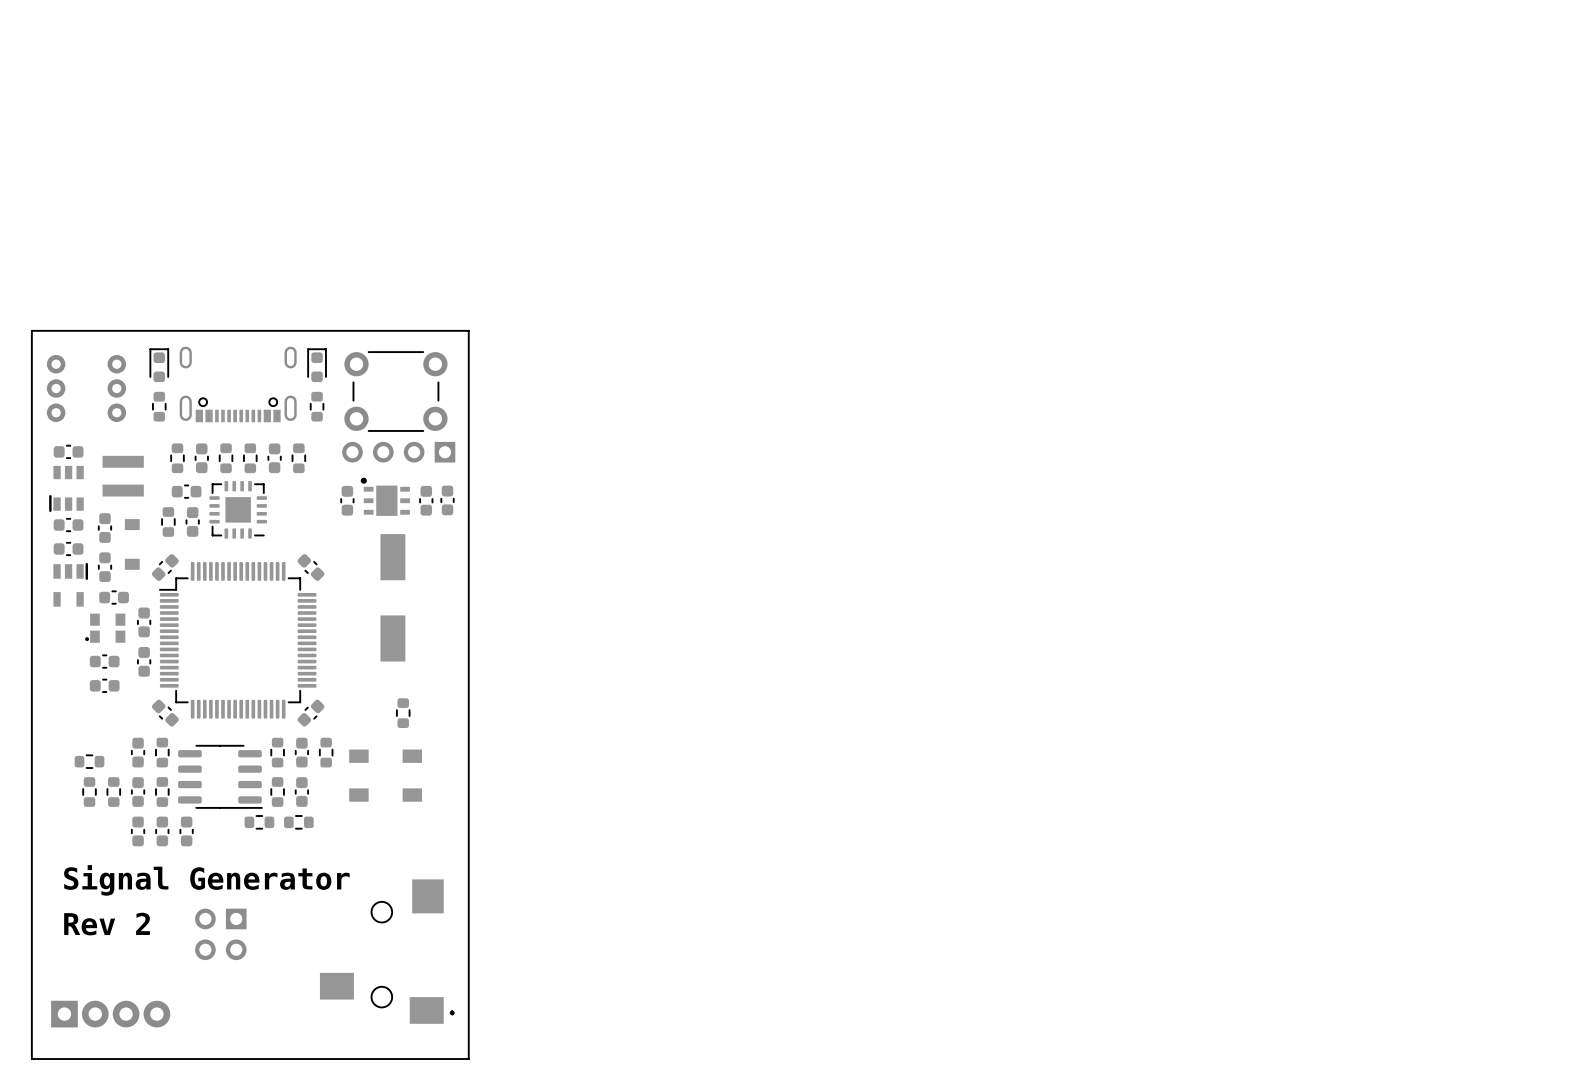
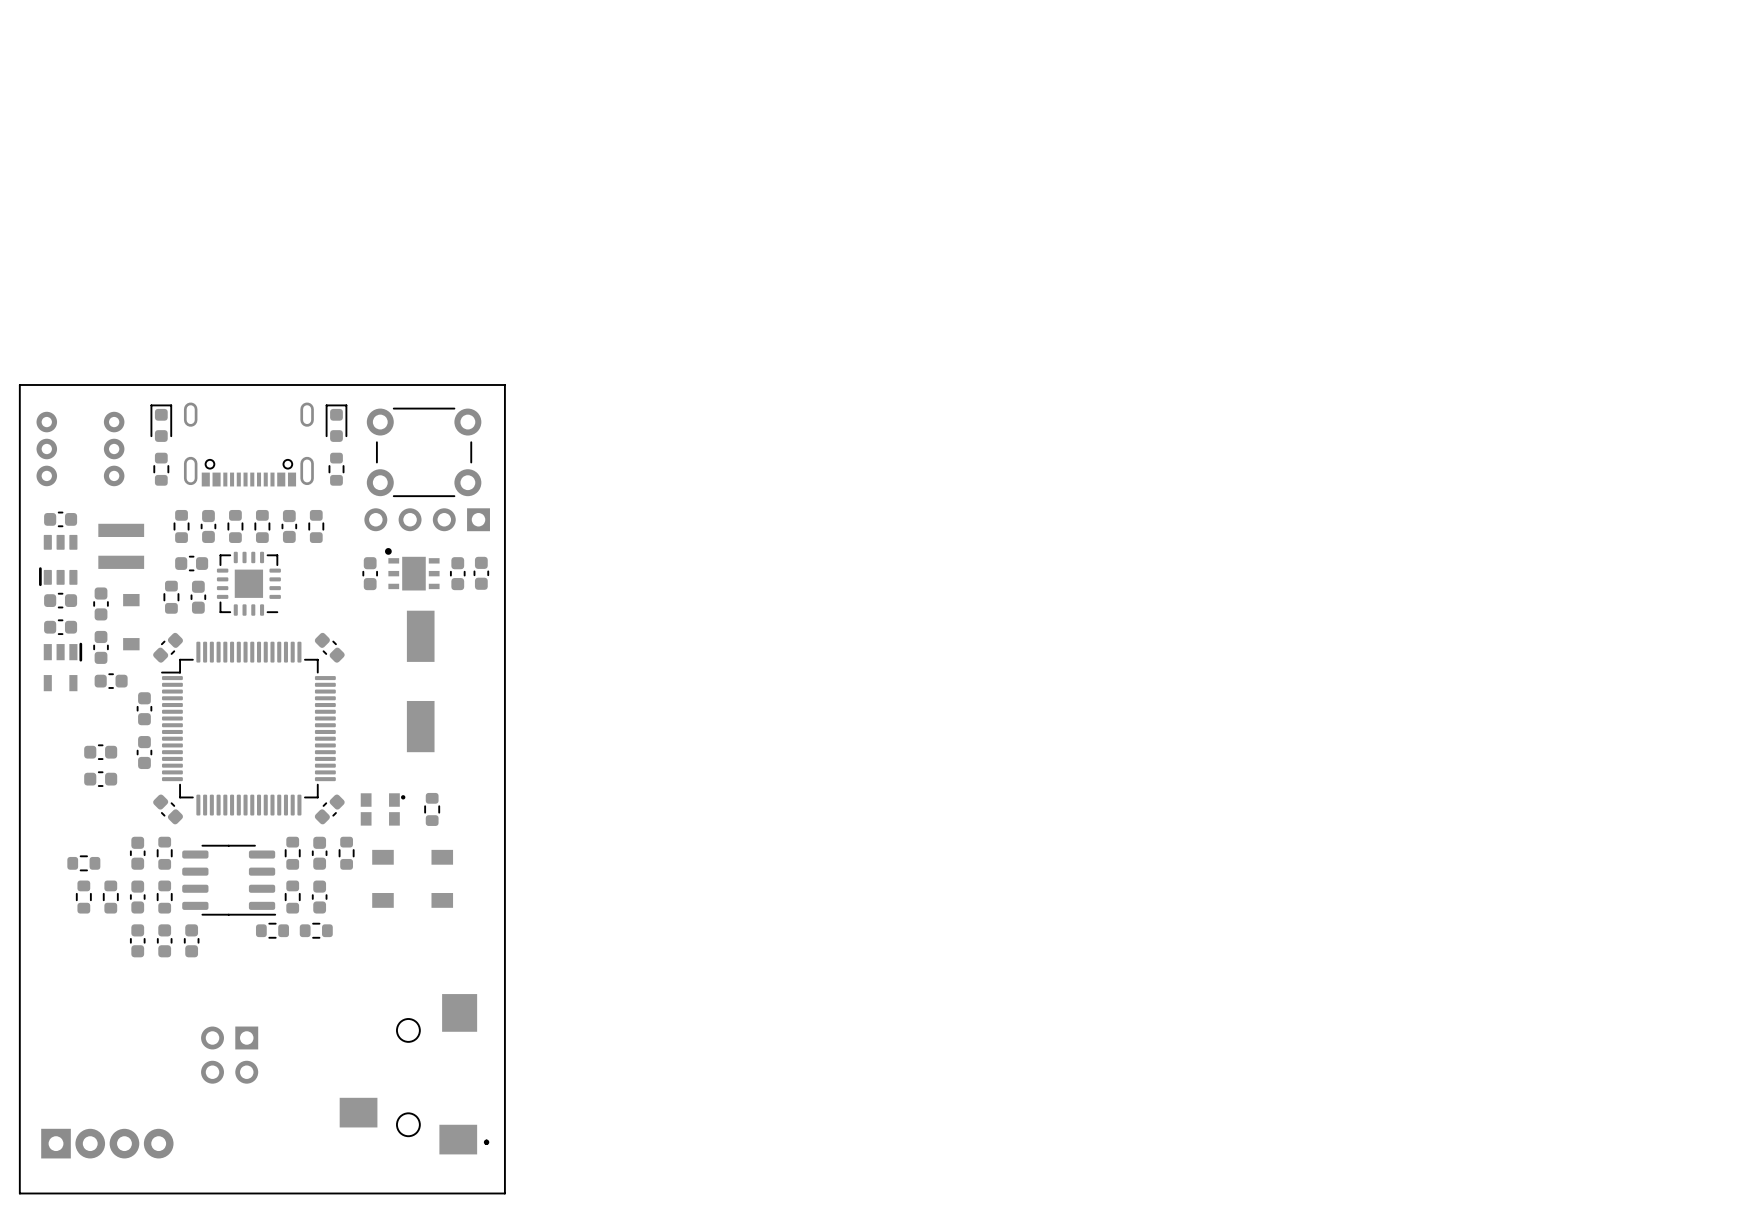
part rotation: 0° (105, 628) -> 180° (383, 809)
part position: (105, 628) -> (383, 809)
text: Signal Generator (206, 880) -> none
text: Rev 2 (107, 924) -> none

